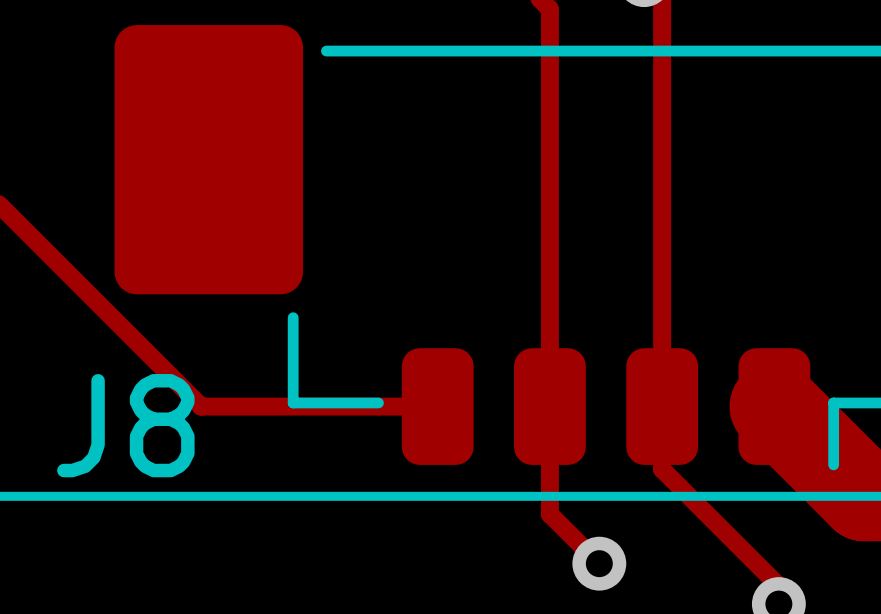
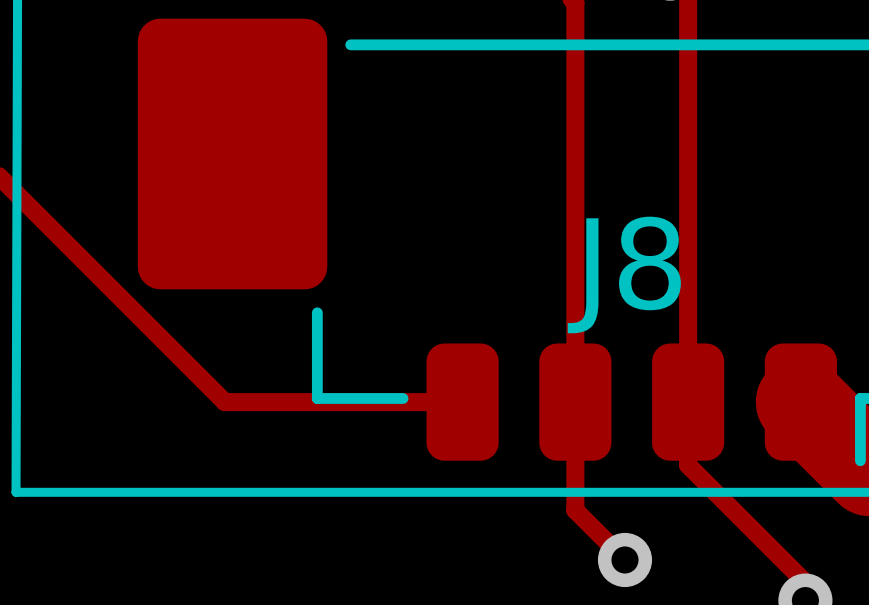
J8 name position: J8 (125, 425) -> J8 (624, 274)

